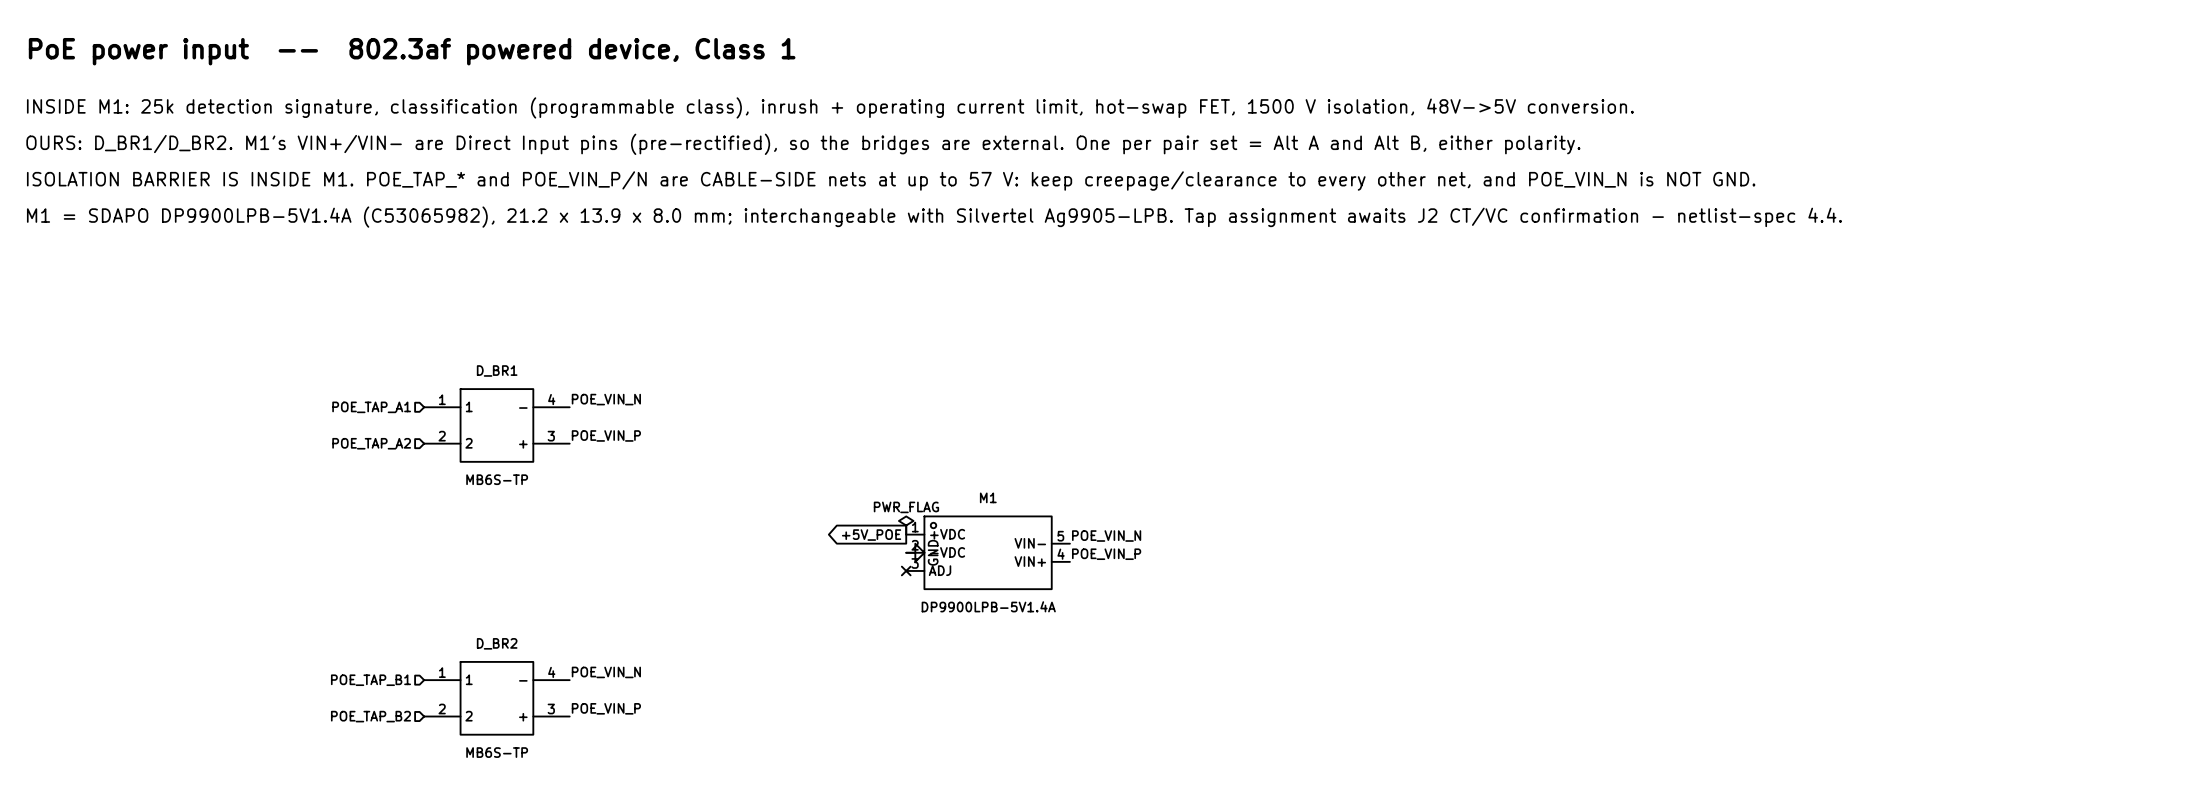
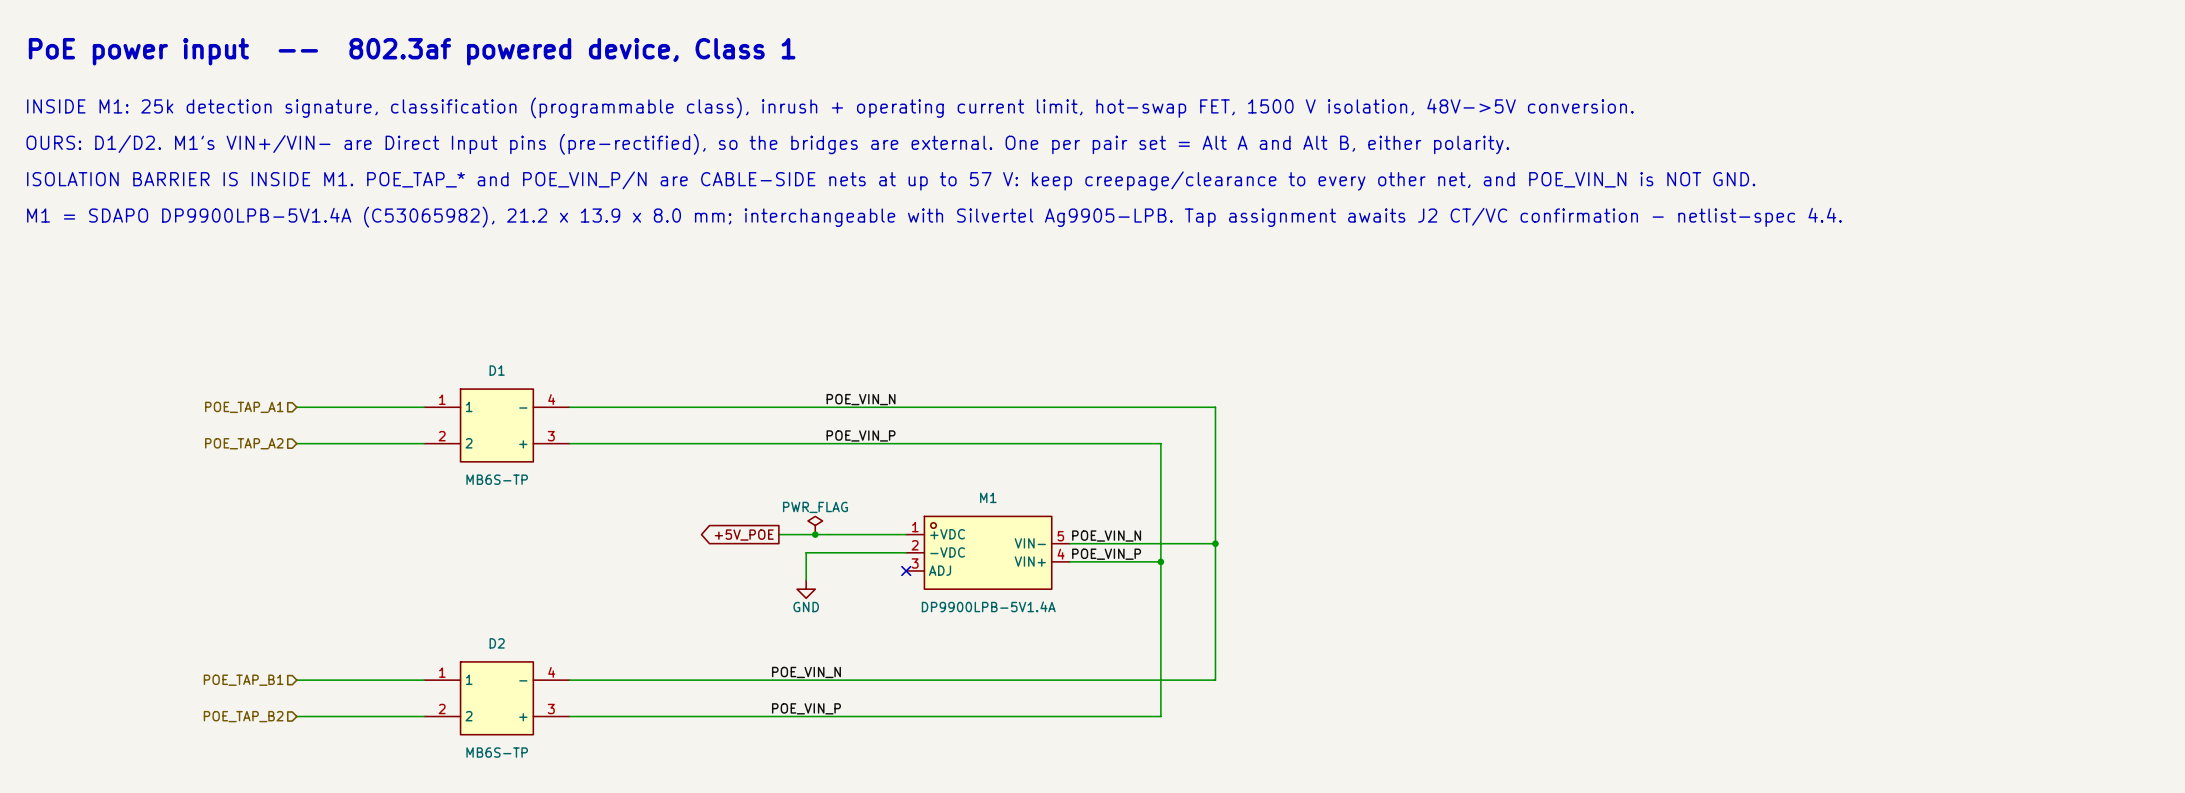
text: OURS: D_BR1/D_BR2. M1's VIN+/VIN- are Direct Input pins (pre-rectified), so the bridges are external. One per pair set = Alt A and Alt B, either polarity. (803, 144) -> OURS: D1/D2. M1's VIN+/VIN- are Direct Input pins (pre-rectified), so the bridges are external. One per pair set = Alt A and Alt B, either polarity. (767, 144)
D_BR1 name: D_BR1 (497, 370) -> D1 (497, 370)
label: POE_VIN_N (606, 399) -> none
label: none -> POE_VIN_N (861, 399)
wire: none -> (296, 407) (424, 407)
hierarchical label position: POE_TAP_A1 (371, 407) -> POE_TAP_A1 (244, 407)
wire: none -> (569, 407) (1215, 407) (1215, 680) (569, 680)
label: POE_VIN_P (606, 435) -> none
label: none -> POE_VIN_P (861, 435)
wire: none -> (296, 443) (424, 443)
hierarchical label position: POE_TAP_A2 (371, 443) -> POE_TAP_A2 (244, 443)
wire: none -> (569, 443) (1160, 443) (1160, 716) (569, 716)
power symbol position: PWR_FLAG (906, 525) -> PWR_FLAG (815, 525)
wire: none -> (778, 534) (906, 534)
junction: none -> (815, 534)
global label position: +5V_POE (871, 535) -> +5V_POE (744, 535)
wire: none -> (1069, 543) (1215, 543)
junction: none -> (1215, 543)
wire: none -> (906, 552) (806, 552) (806, 580)
power symbol rotation: 0° (915, 552) -> 90° clockwise (806, 589)
power symbol position: GND (915, 552) -> GND (806, 589)
wire: none -> (1069, 561) (1160, 561)
junction: none -> (1160, 561)
D_BR2 name: D_BR2 (497, 643) -> D2 (497, 643)
label: POE_VIN_N (606, 672) -> none
label: none -> POE_VIN_N (806, 672)
wire: none -> (296, 680) (424, 680)
hierarchical label position: POE_TAP_B1 (370, 680) -> POE_TAP_B1 (243, 680)
label: POE_VIN_P (606, 708) -> none
label: none -> POE_VIN_P (806, 708)
wire: none -> (296, 716) (424, 716)
hierarchical label position: POE_TAP_B2 (370, 716) -> POE_TAP_B2 (243, 716)

